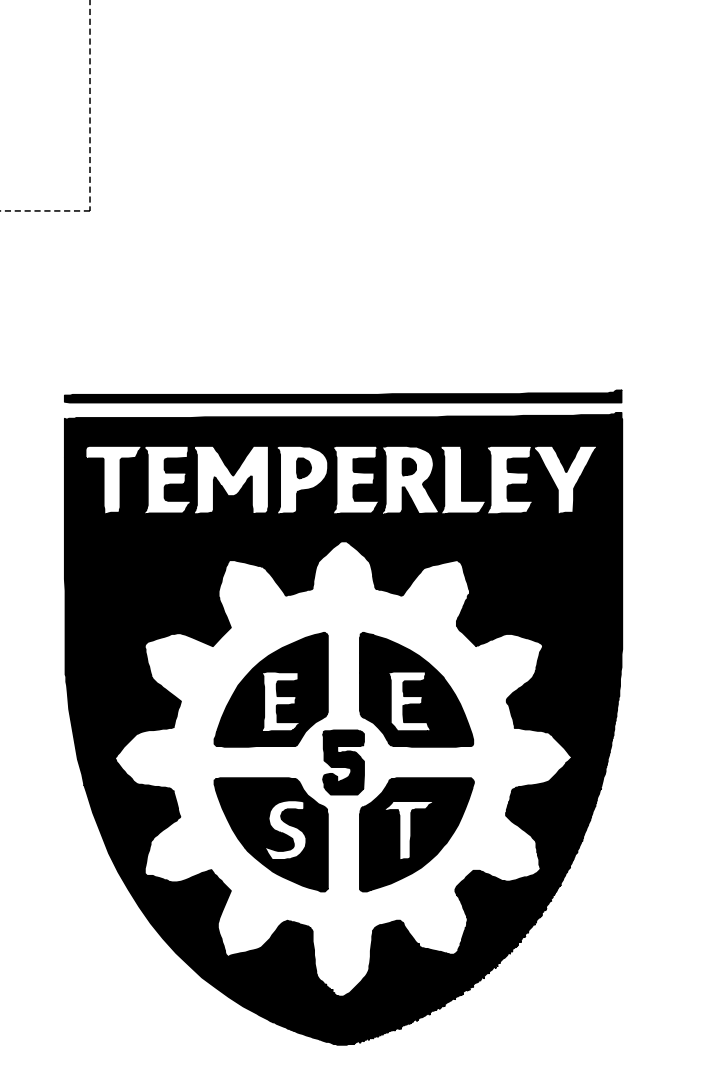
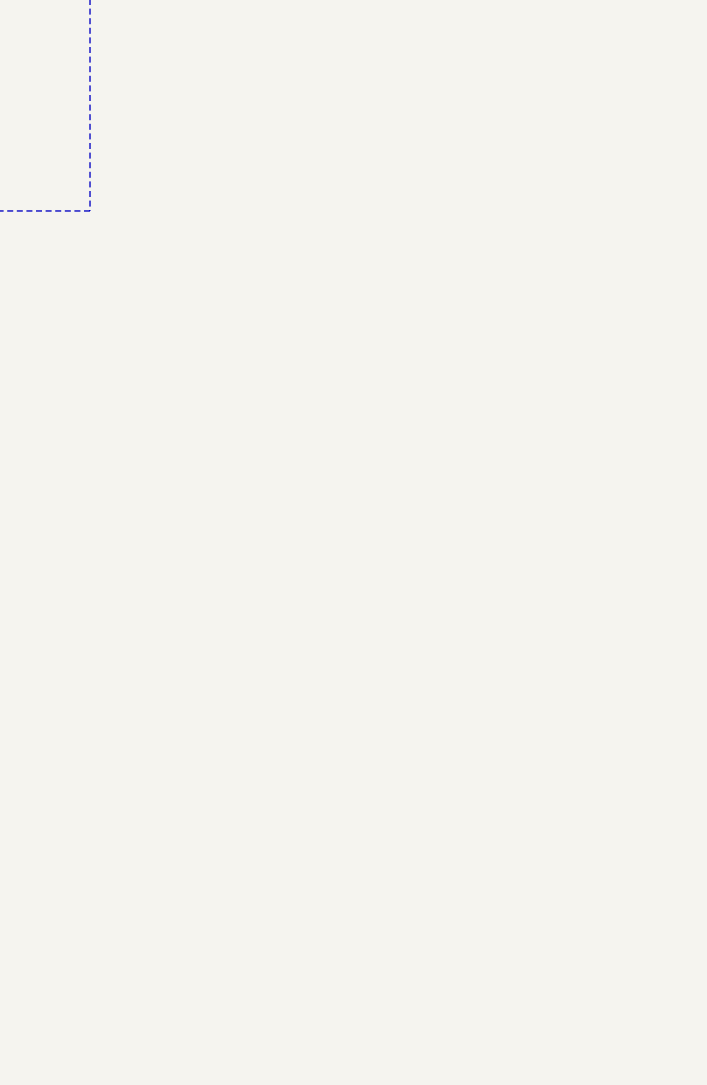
power symbol: (343, 717) -> none

